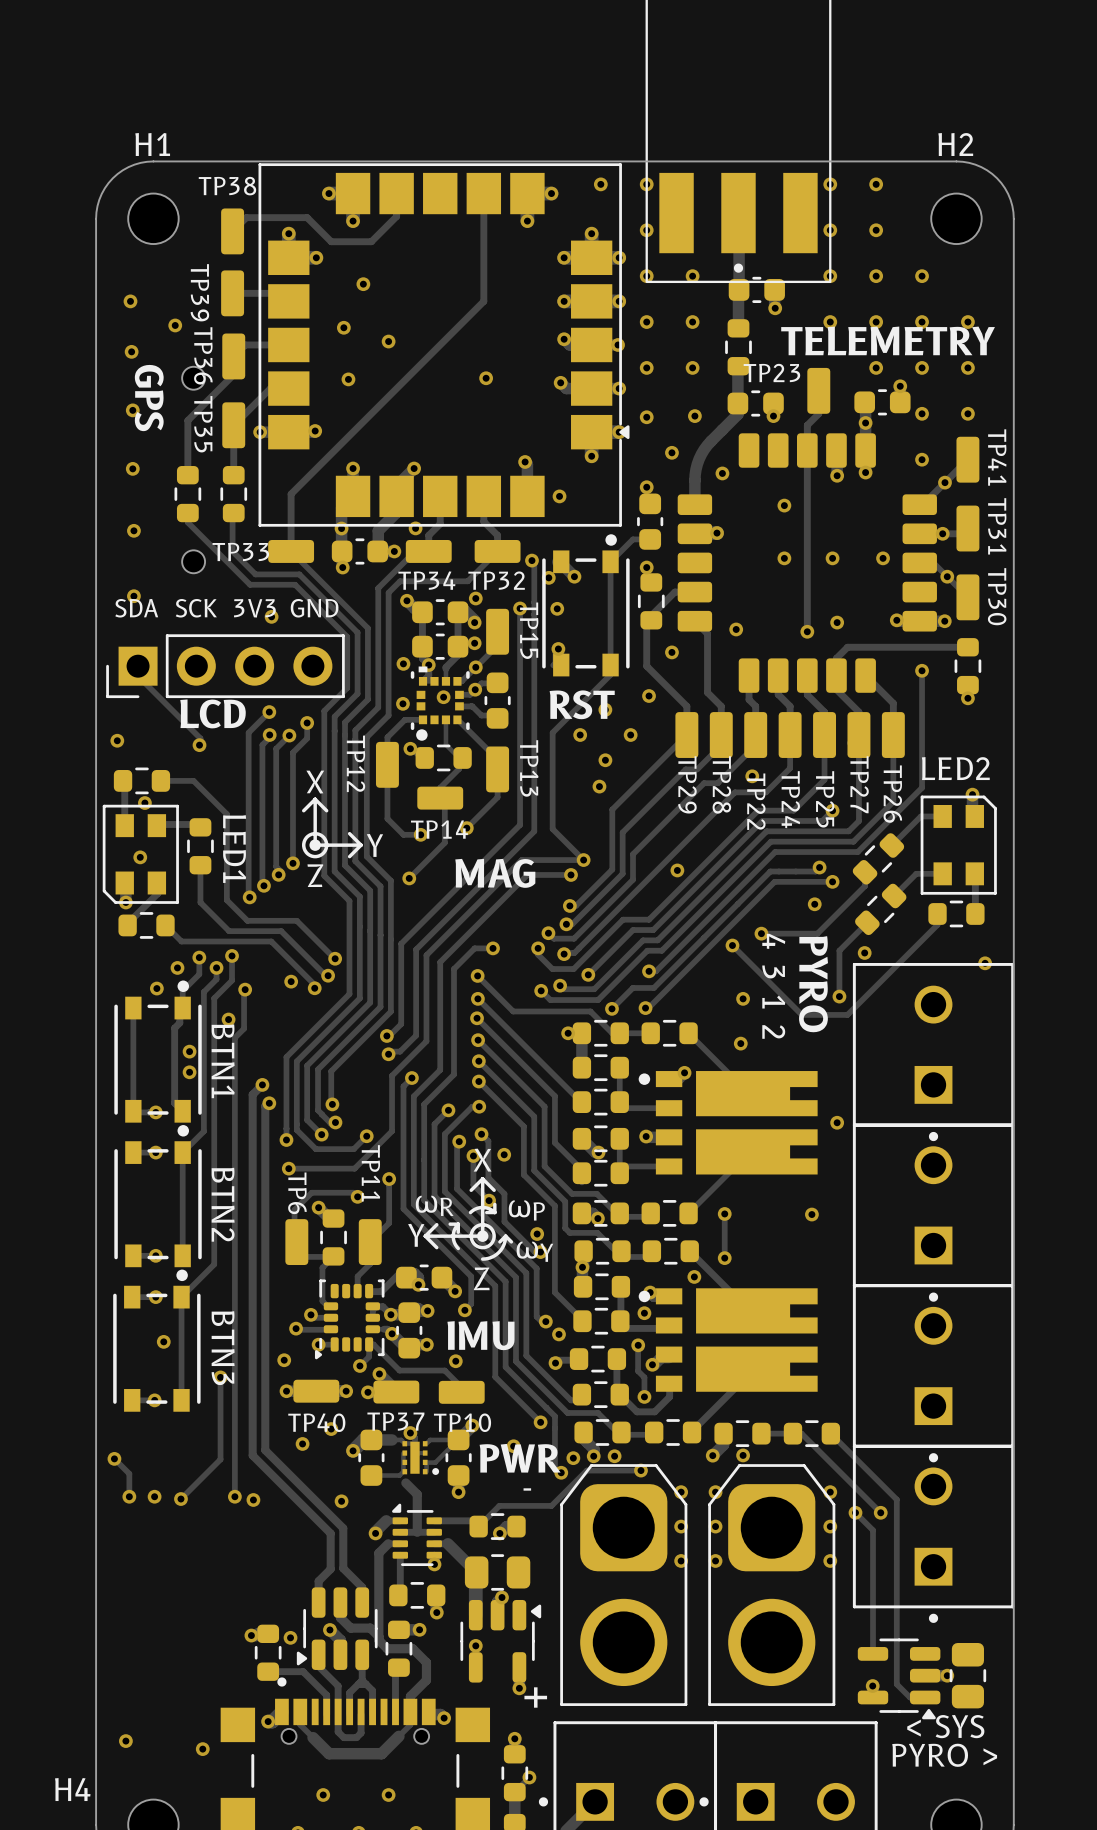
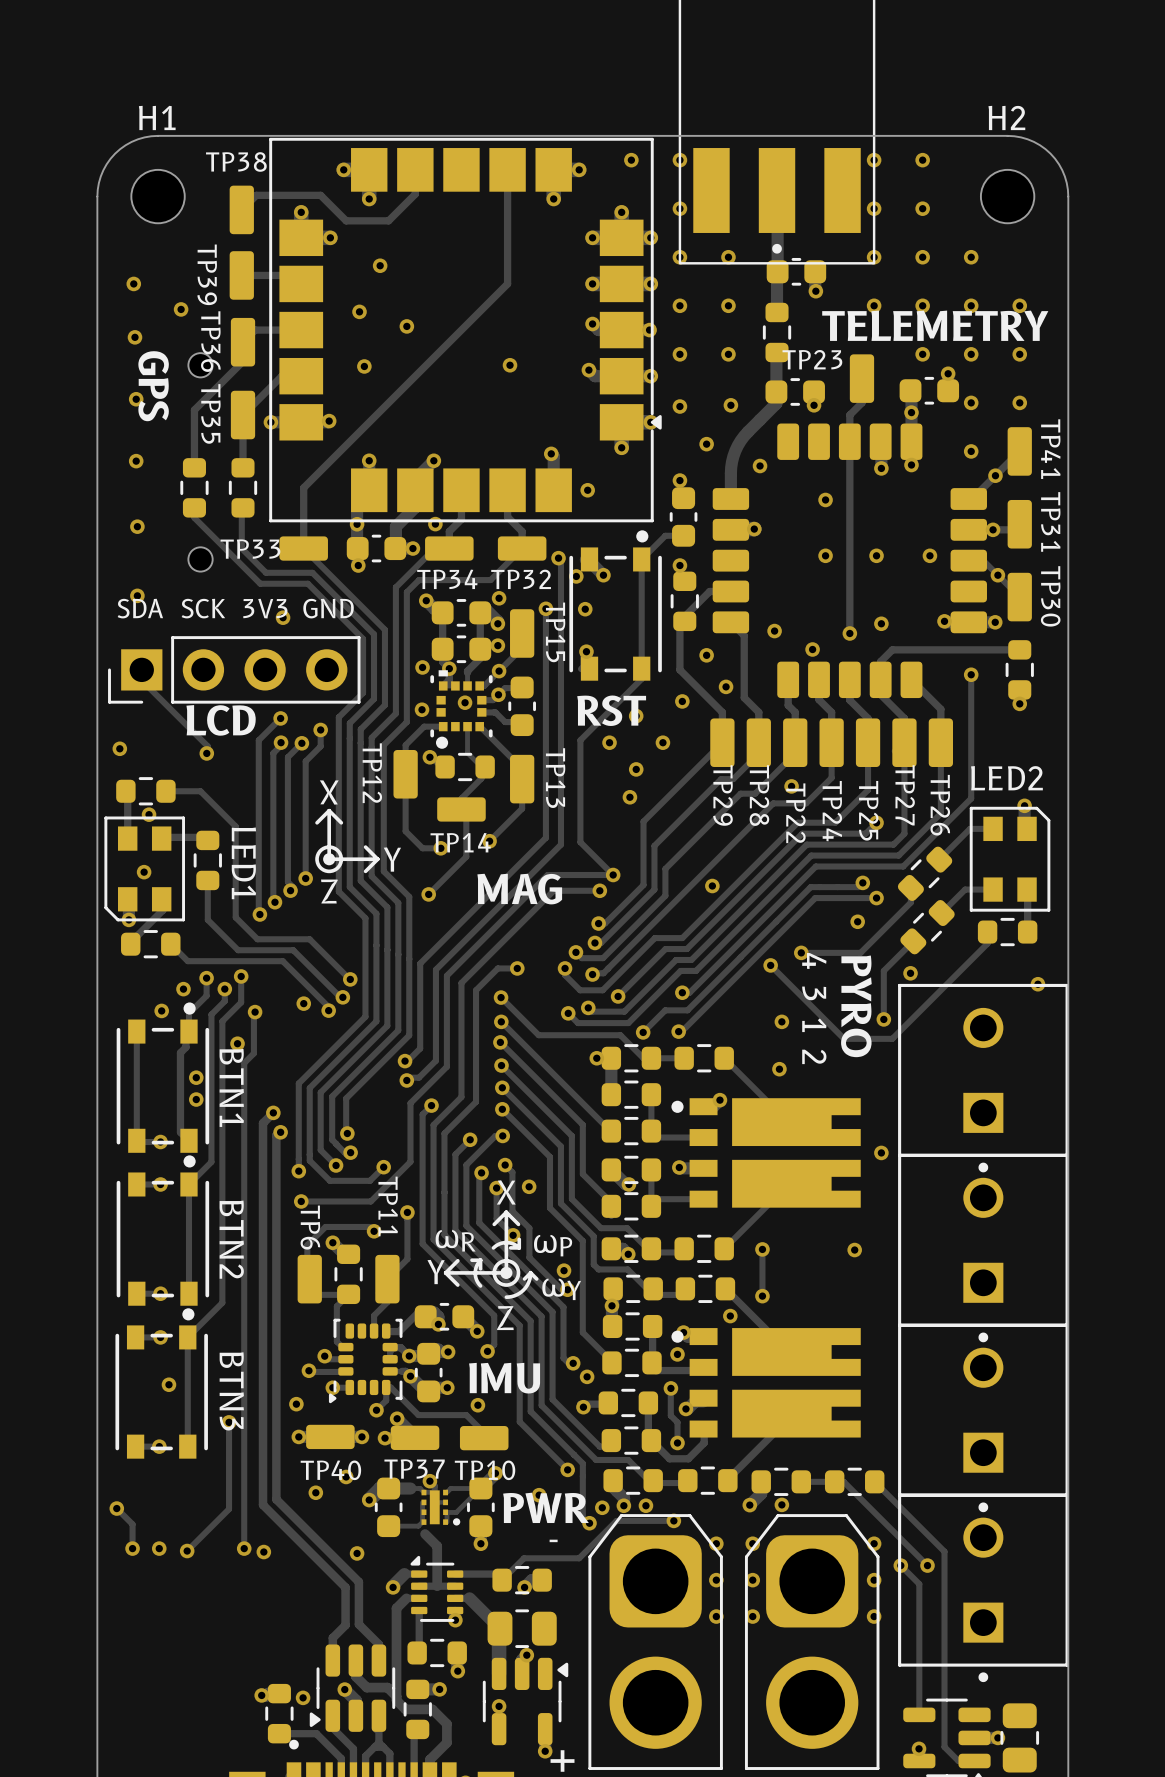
via: none -> (812, 649)
via: none -> (726, 686)

